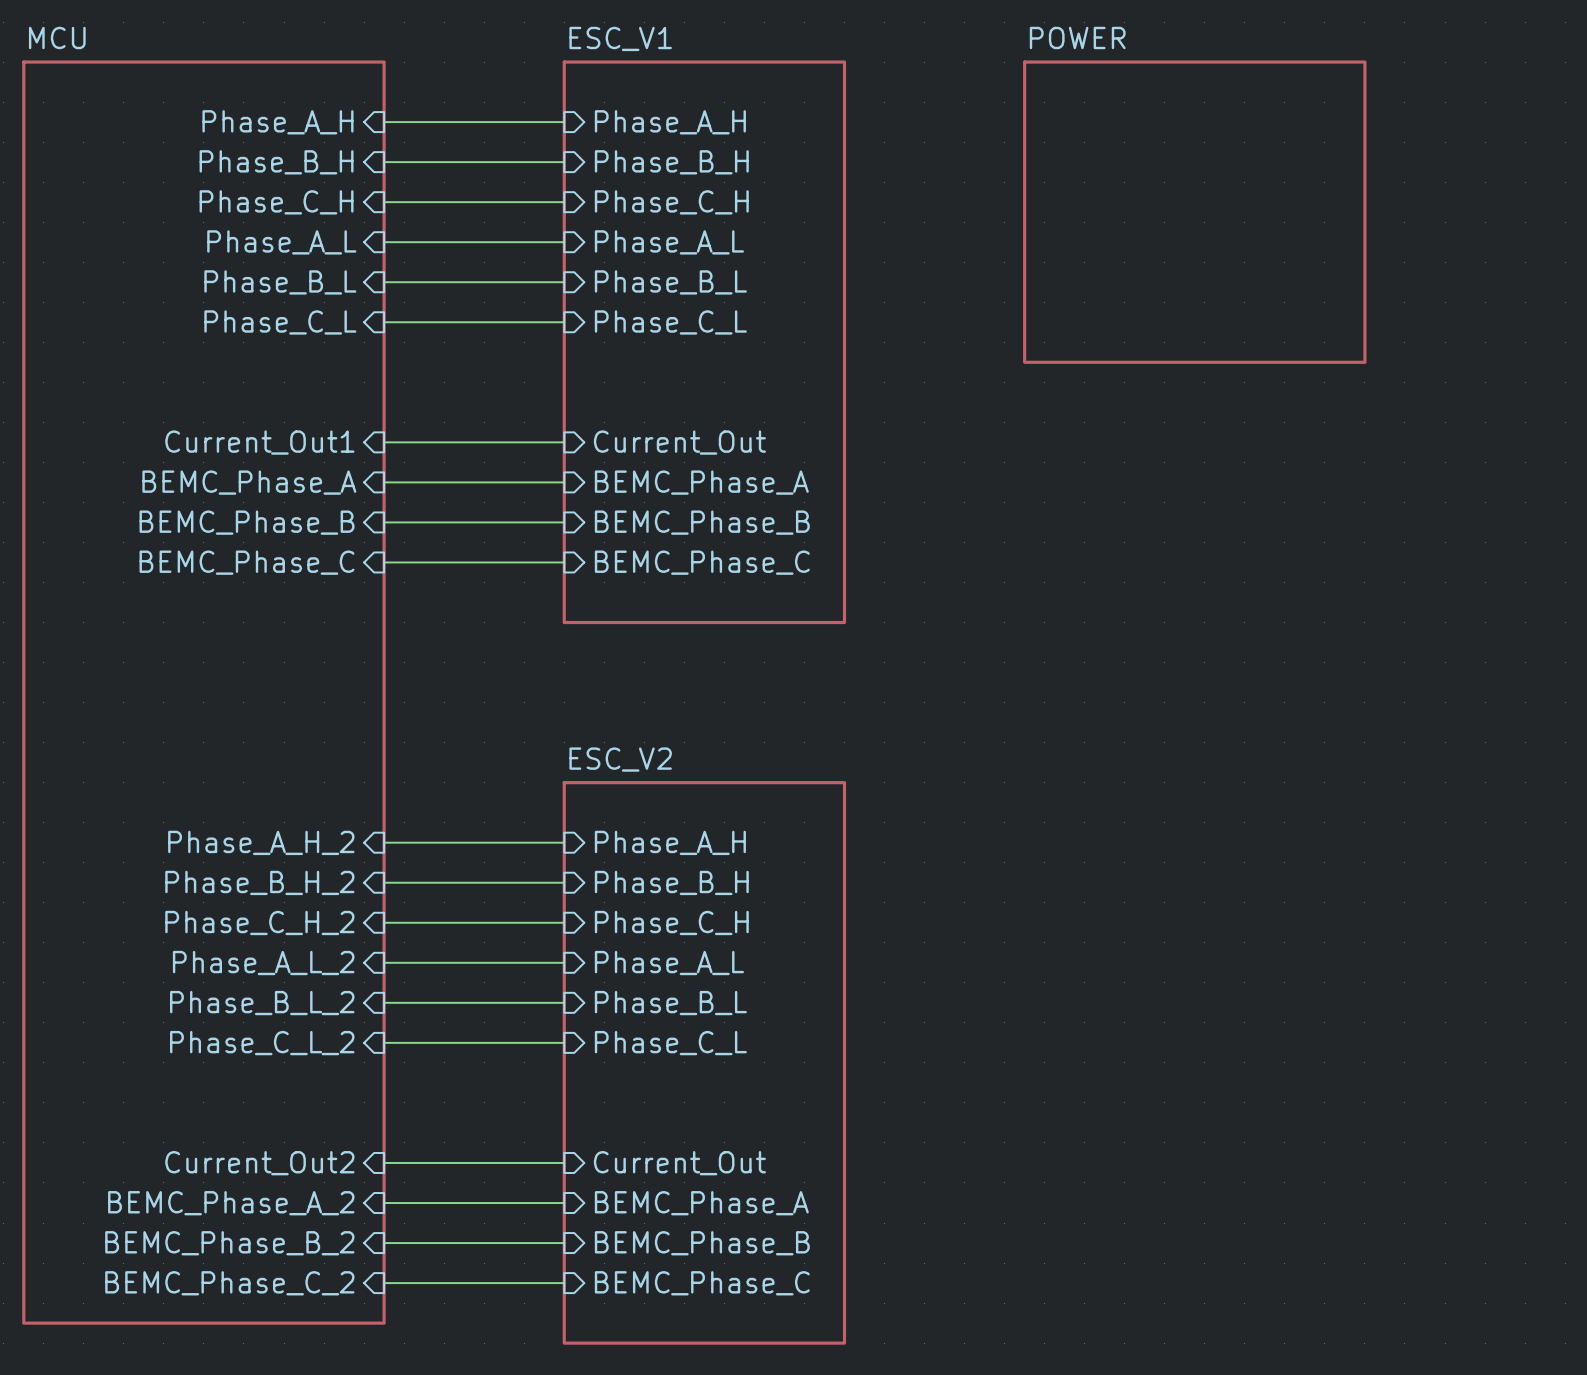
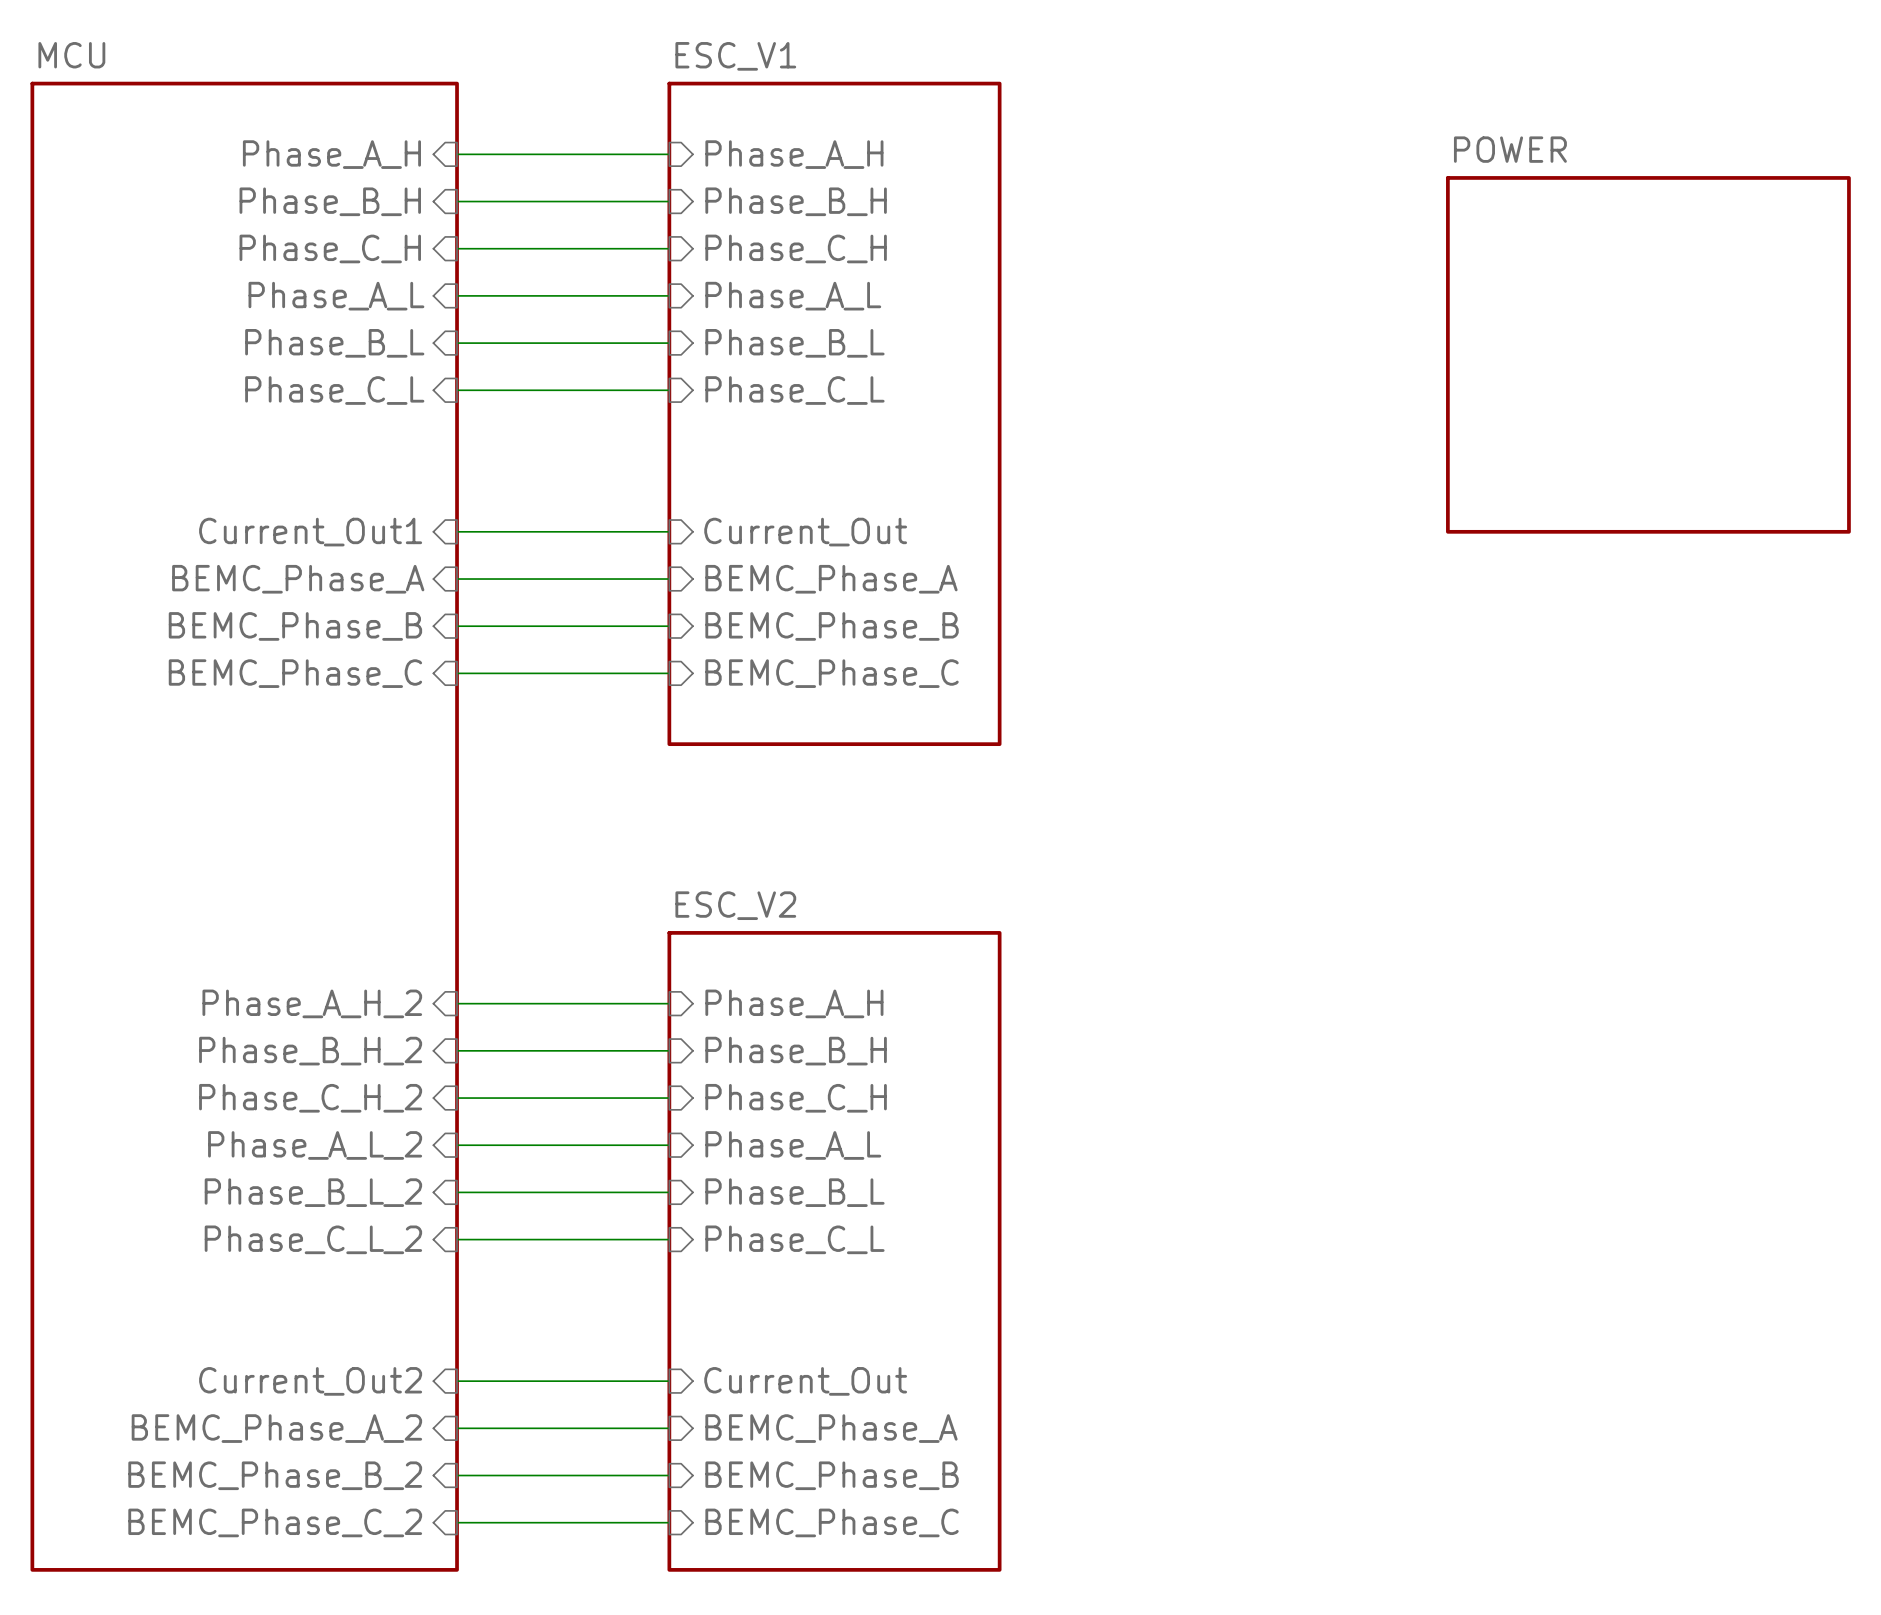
sheet POWER position: (1194, 212) -> (1648, 354)
sheet ESC_V2 shape: [562, 781, 847, 1345] -> [667, 931, 1002, 1572]

